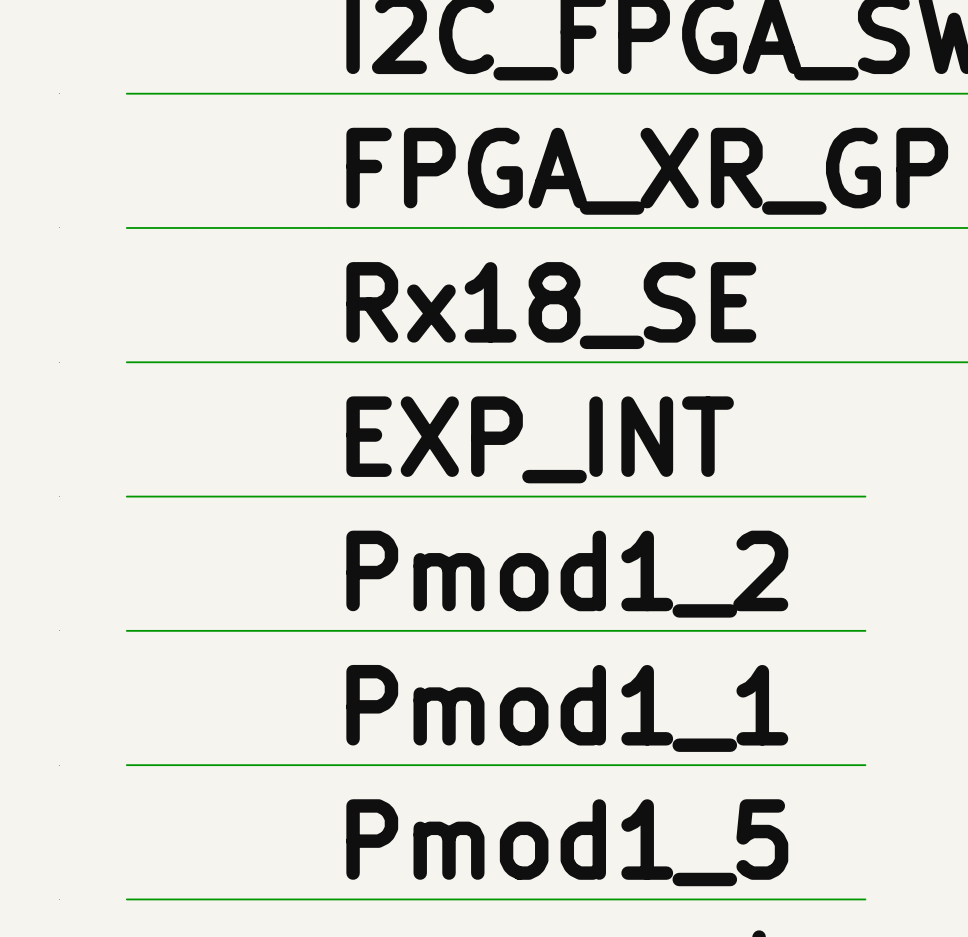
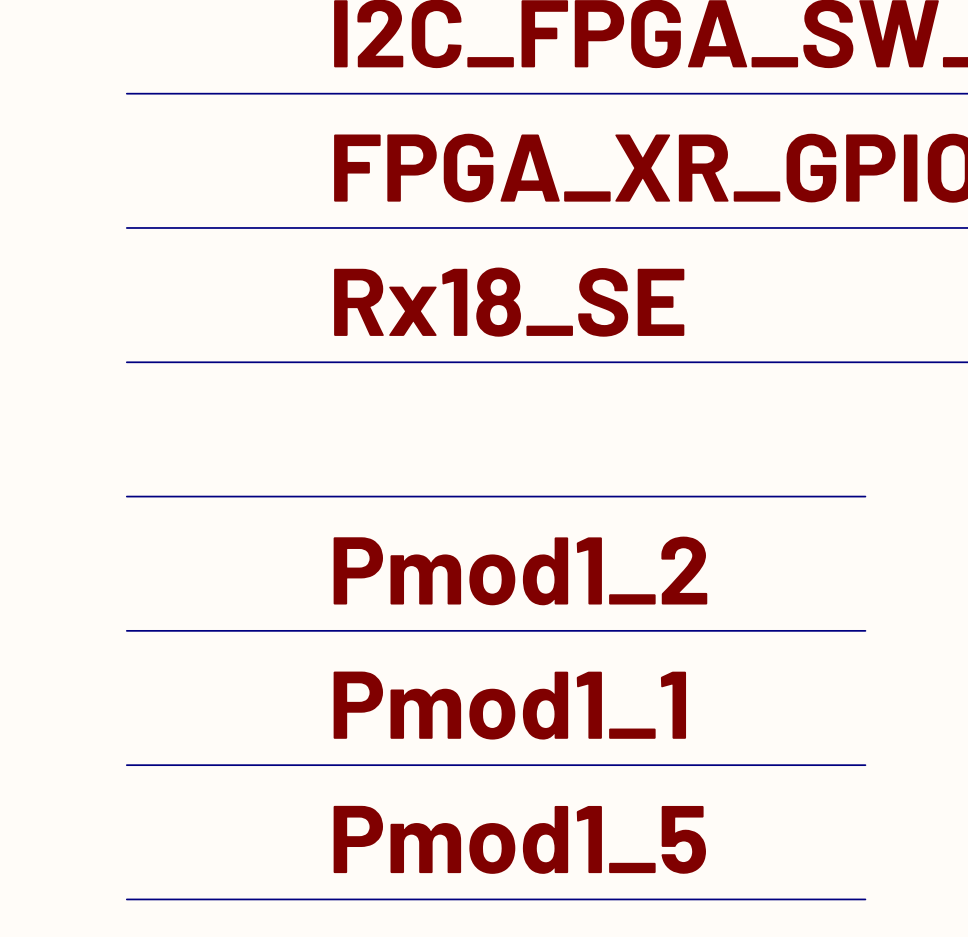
label: EXP_INT (540, 439) -> none

